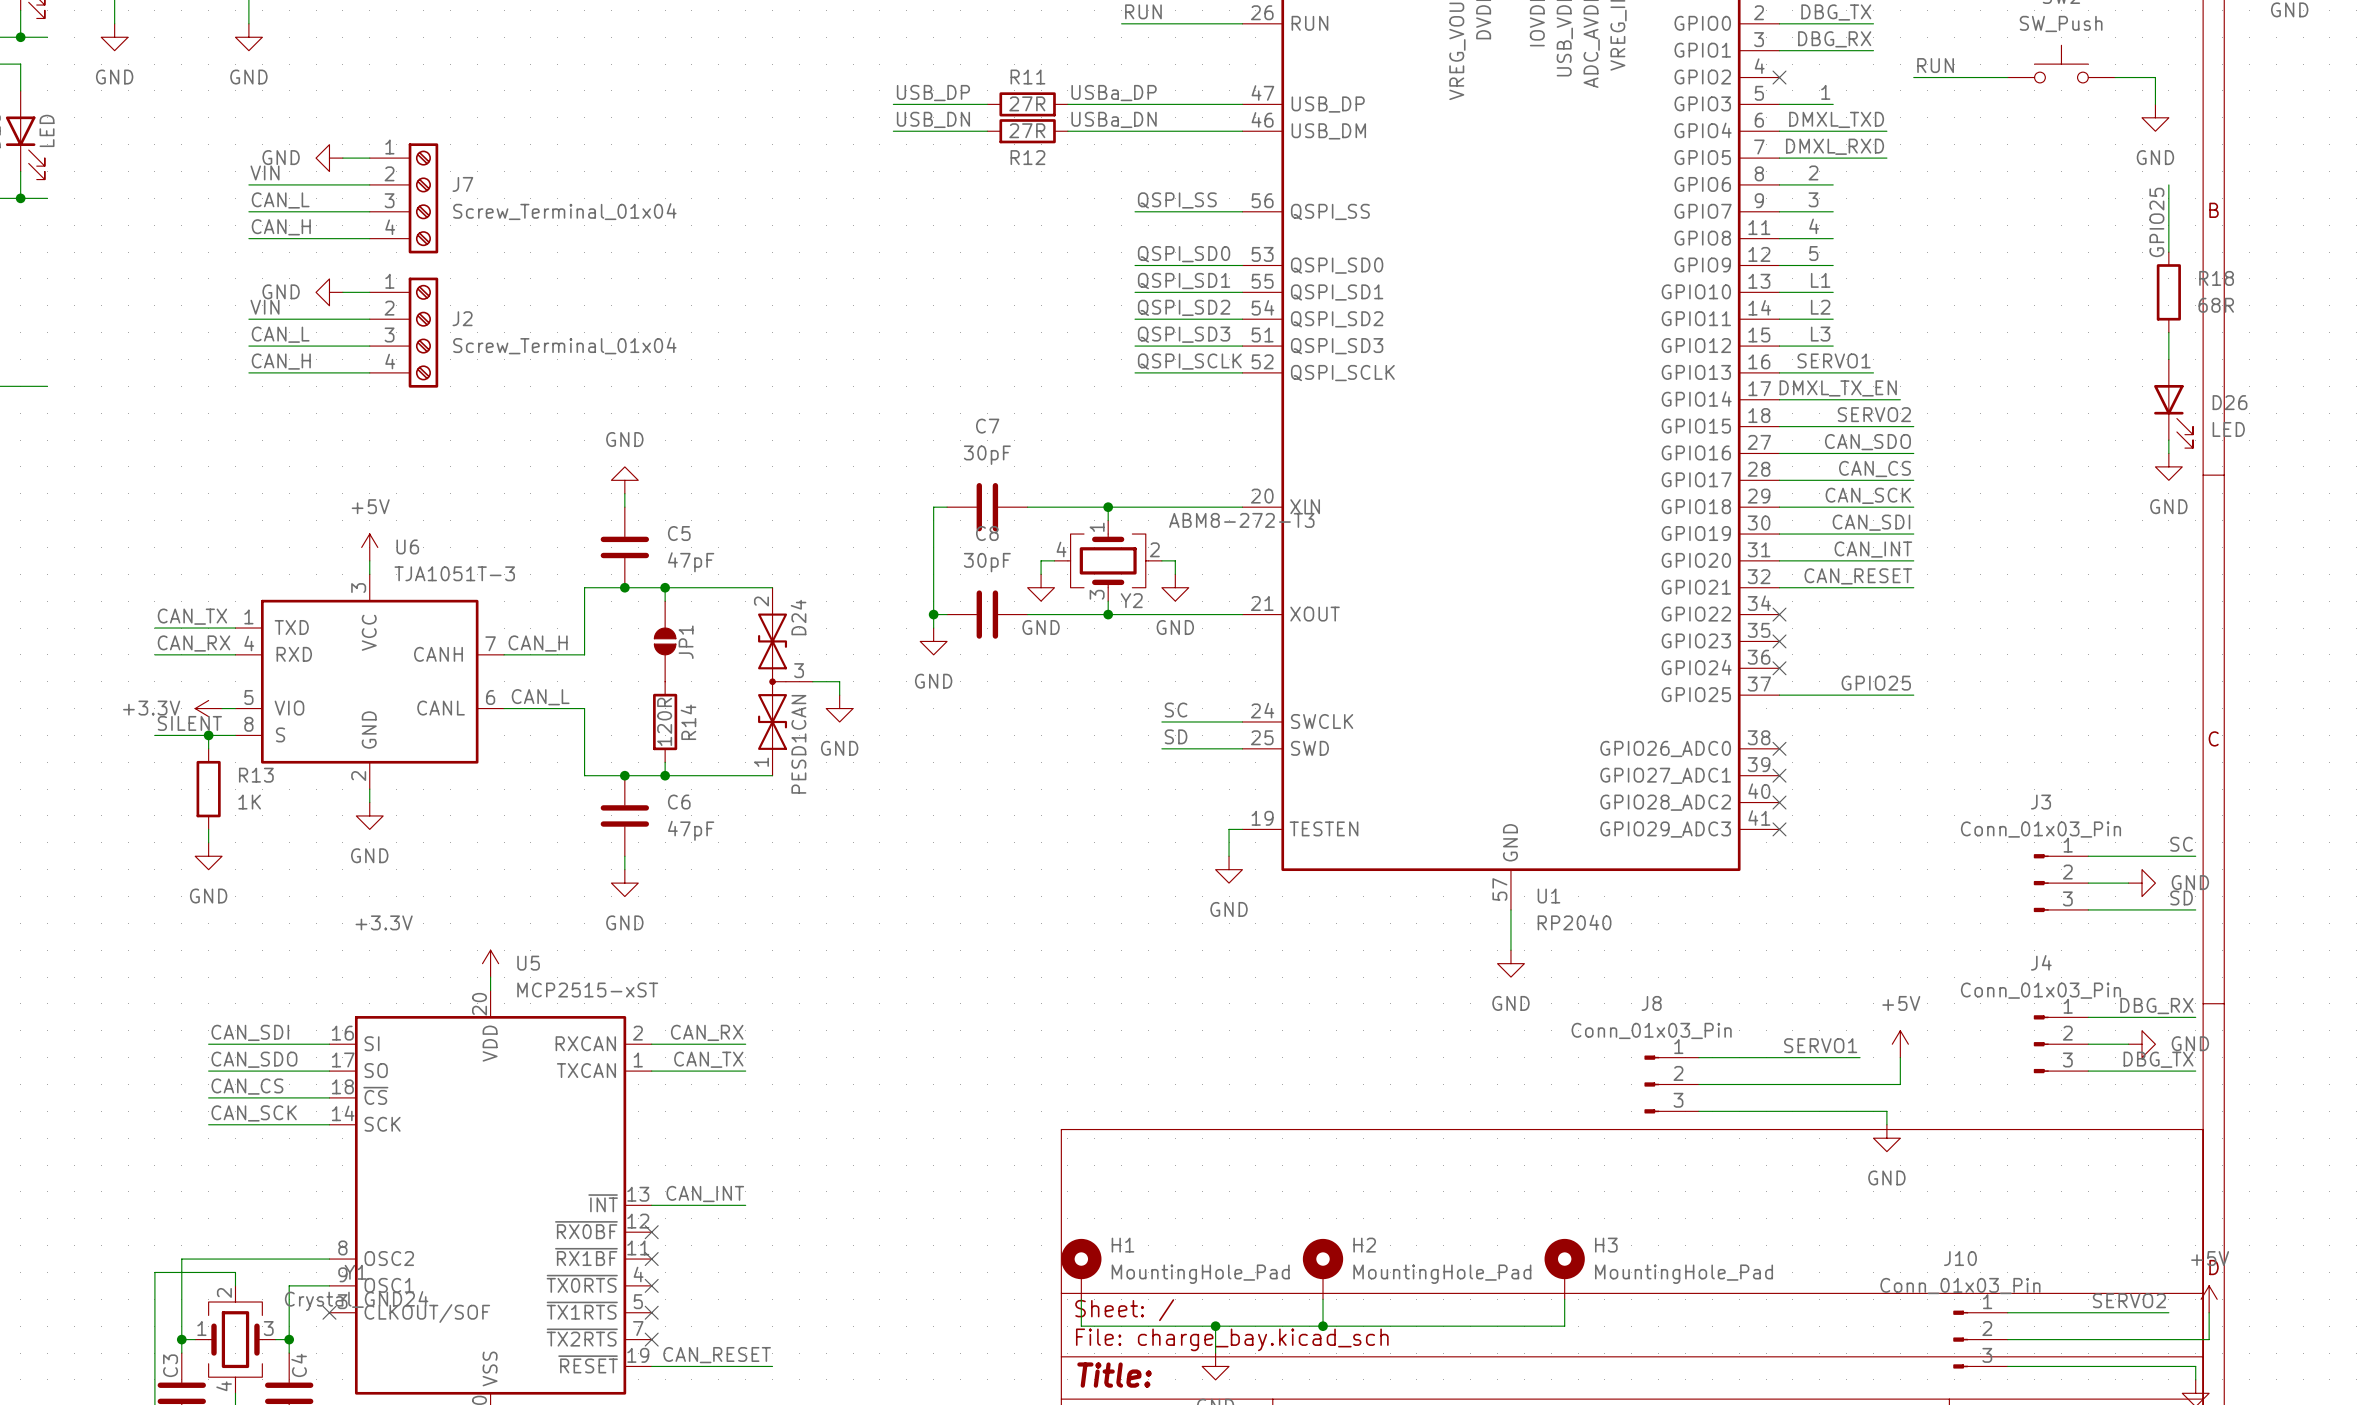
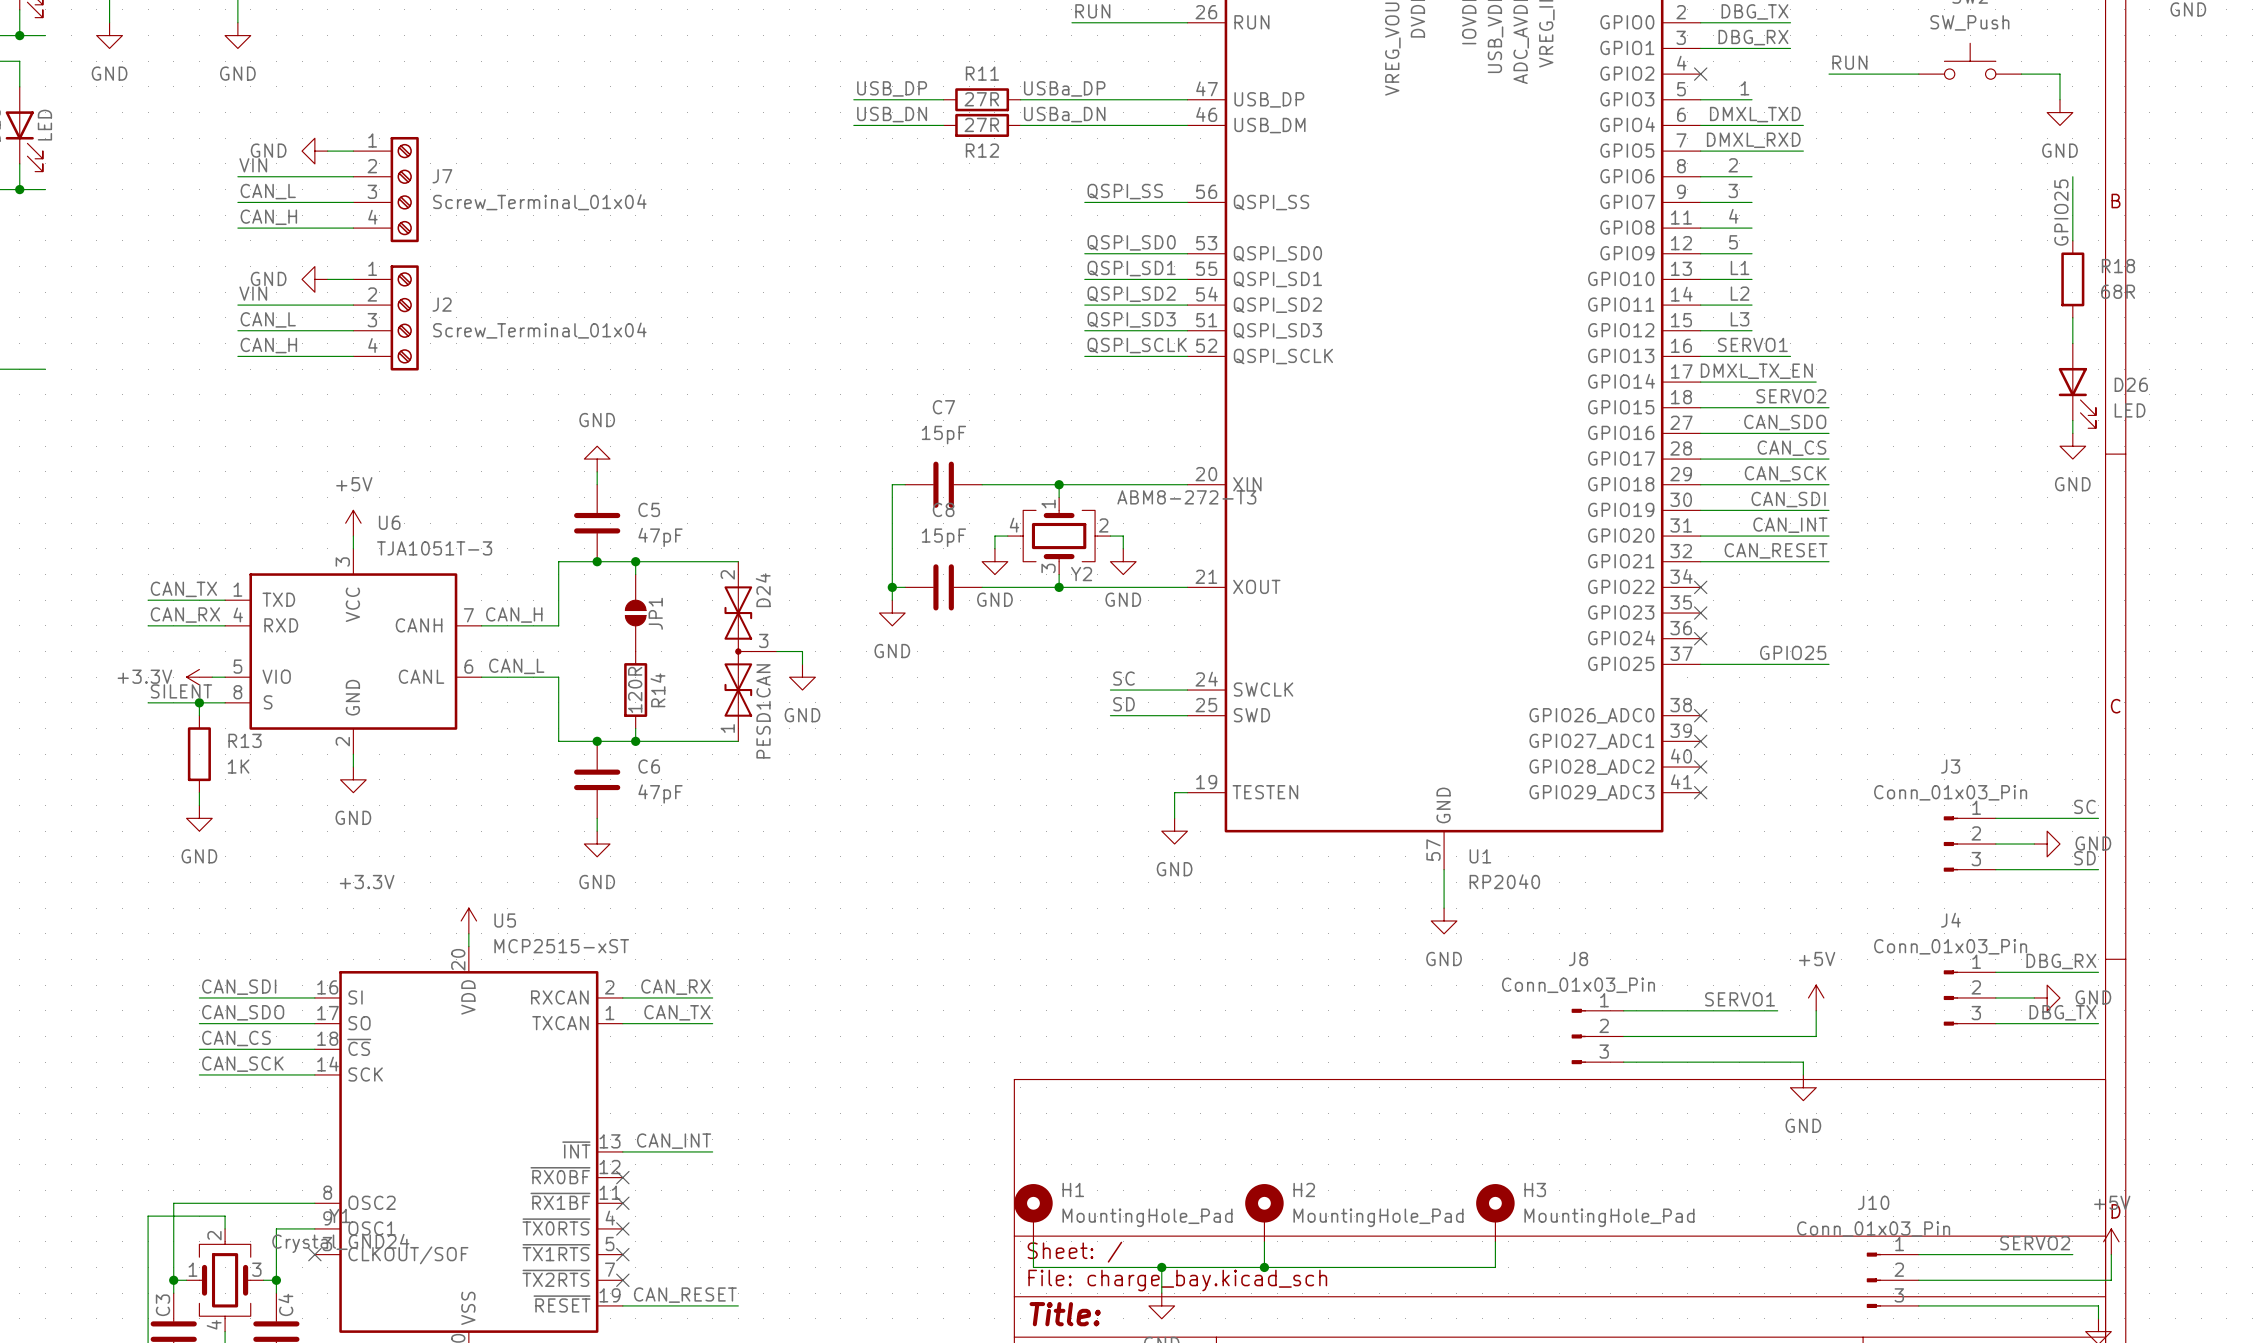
C7 value: 30pF (987, 455) -> 15pF (943, 435)
C8 value: 30pF (987, 562) -> 15pF (943, 537)

